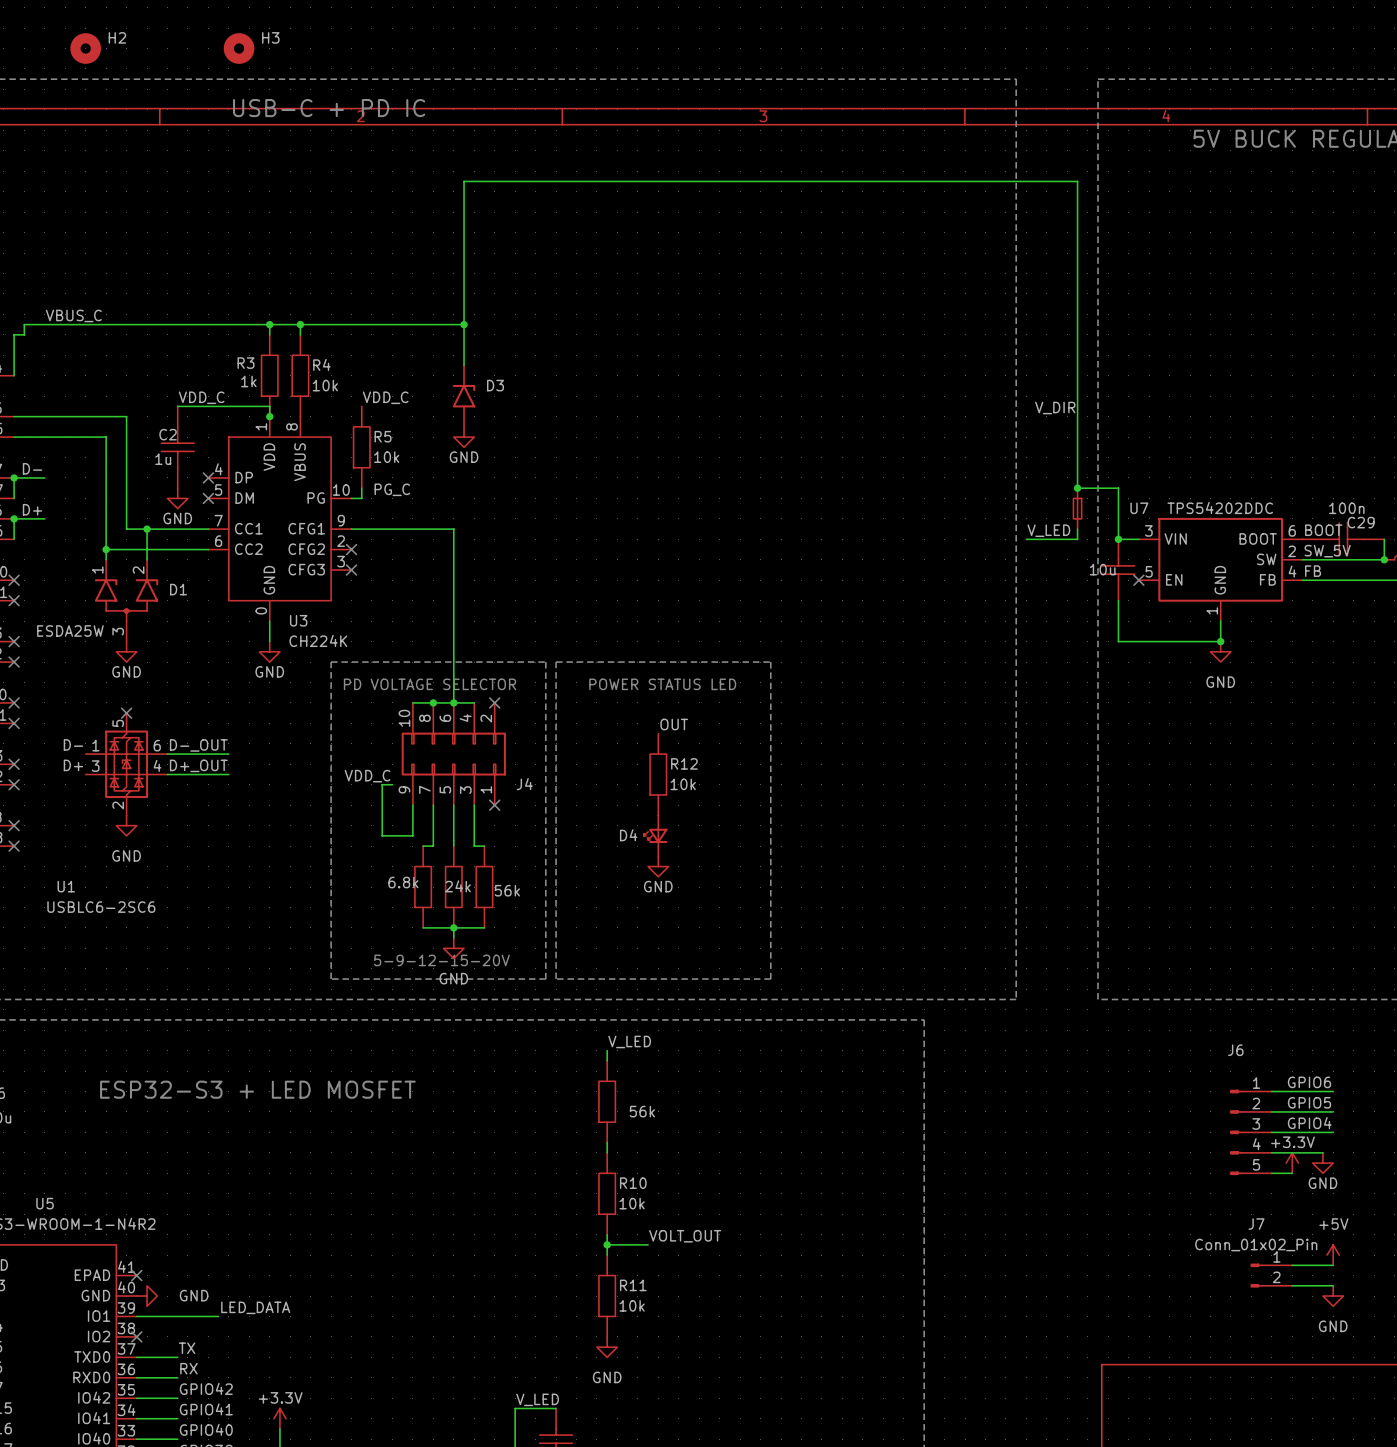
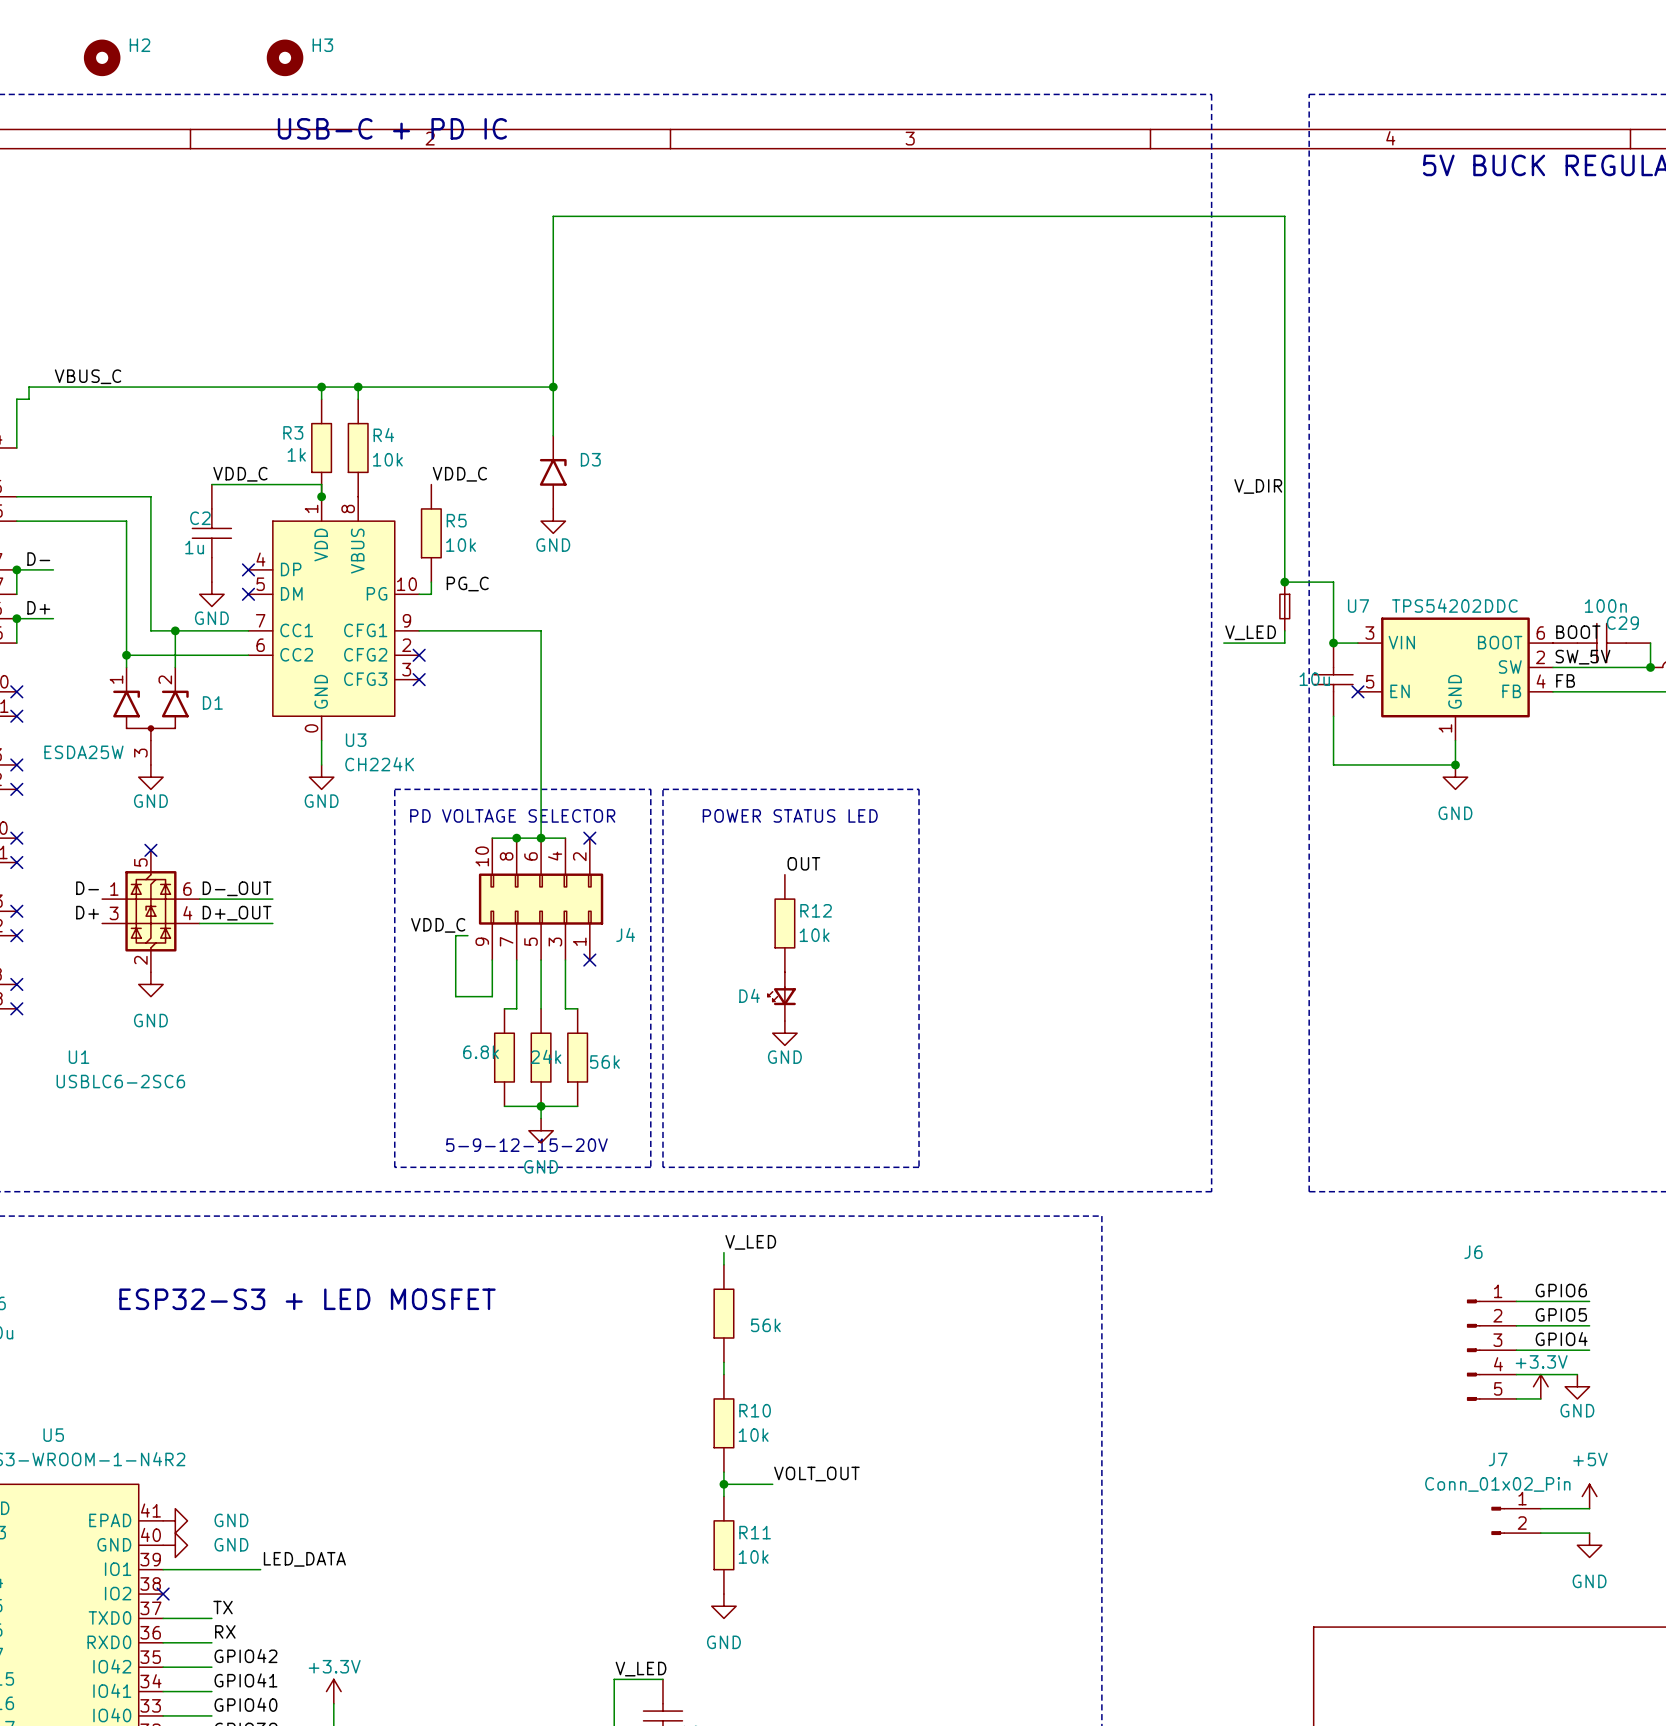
no-connect mark: (136, 1275) -> none
power symbol: none -> GND (175, 1520)

